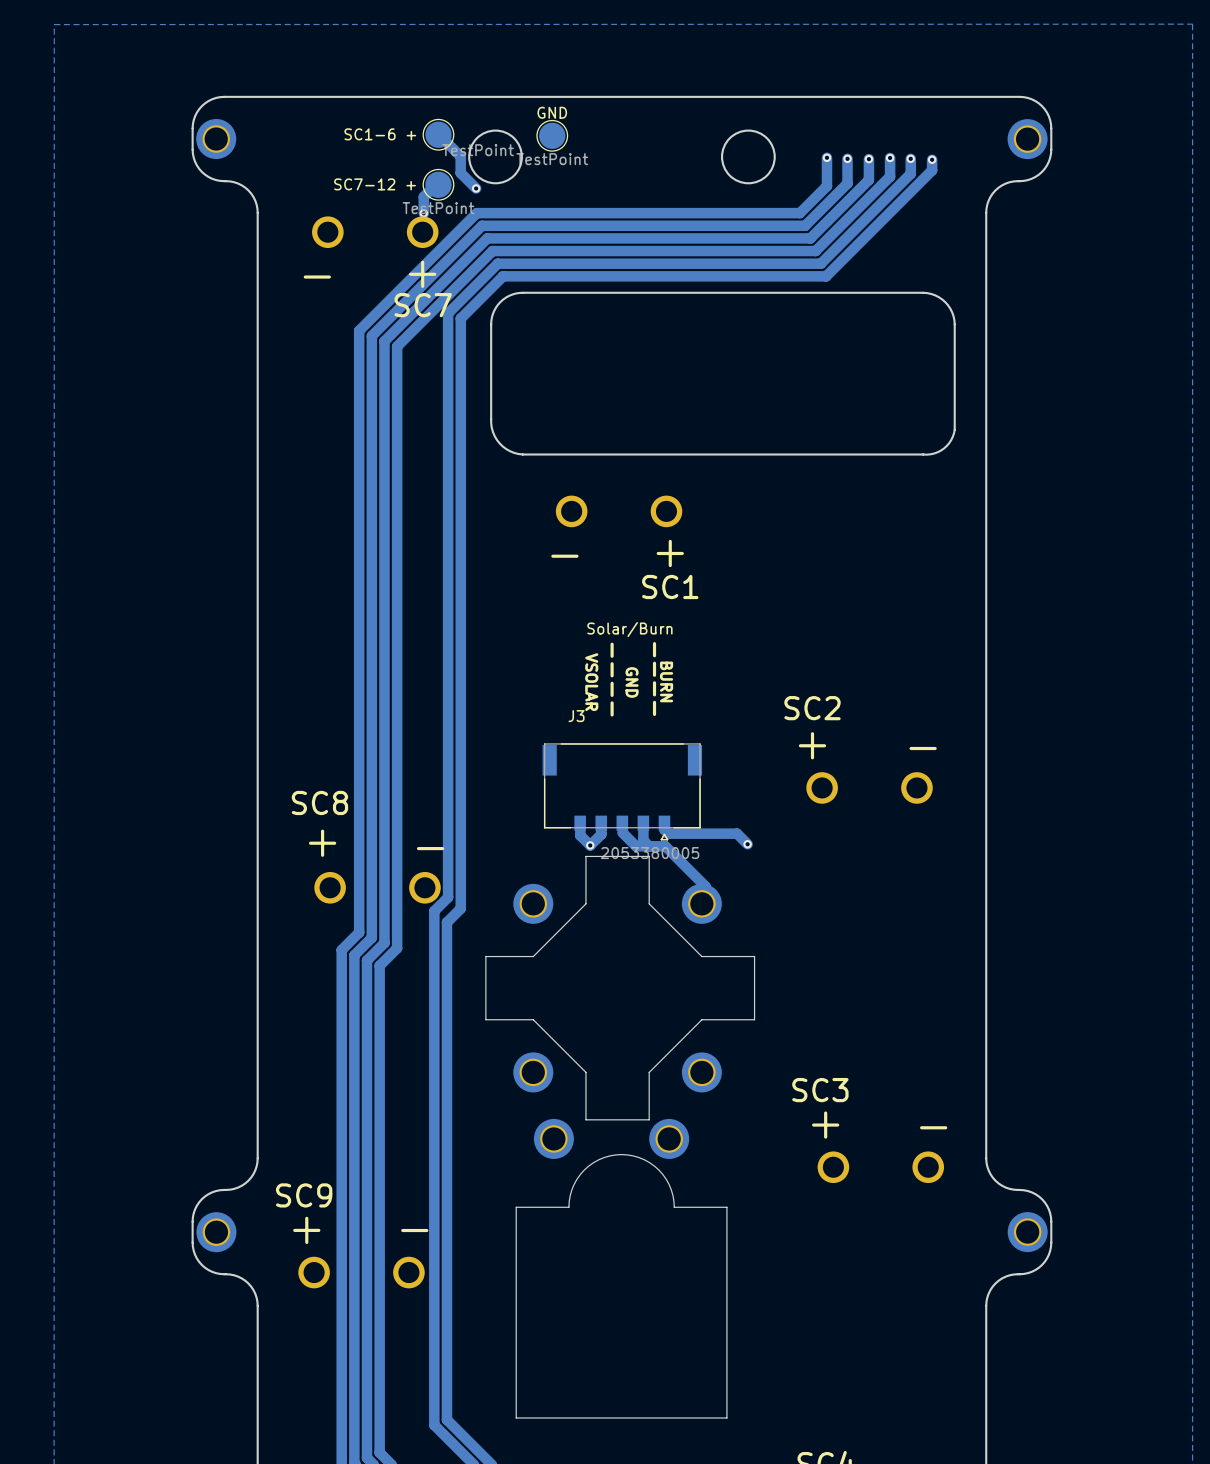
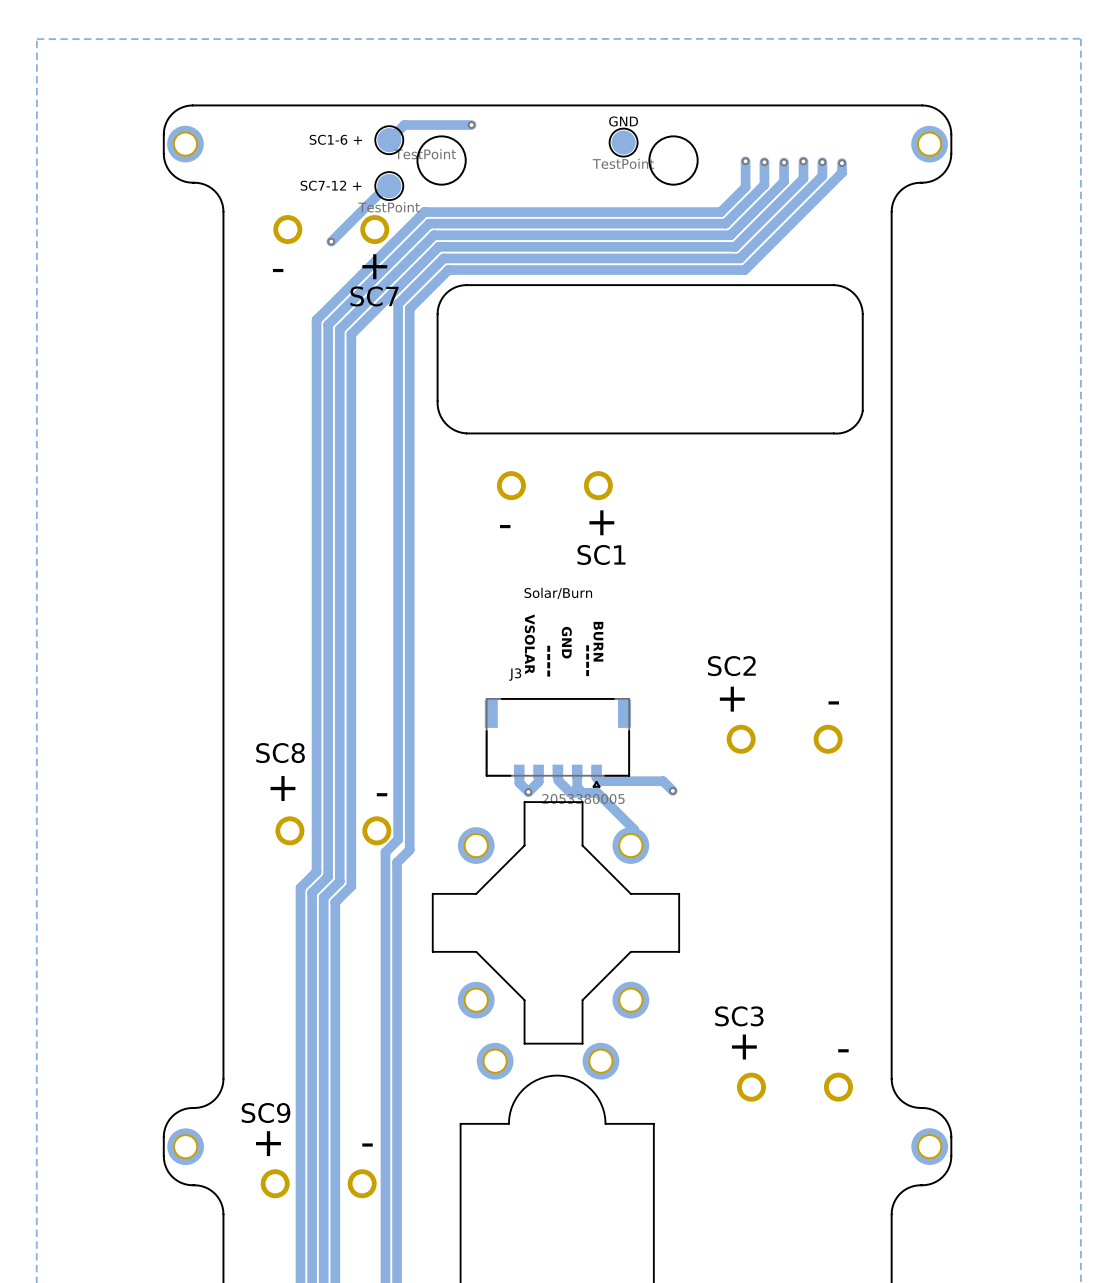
via: none -> (471, 125)
track: (438, 134) (460, 156) (460, 173) (476, 188) -> (389, 140) (404, 125) (471, 125)
GND position: (552, 135) -> (623, 142)
via: (476, 188) -> none
track: (423, 196) (423, 213) -> (375, 197) (331, 241)
via: (423, 213) -> none
via: none -> (331, 241)

